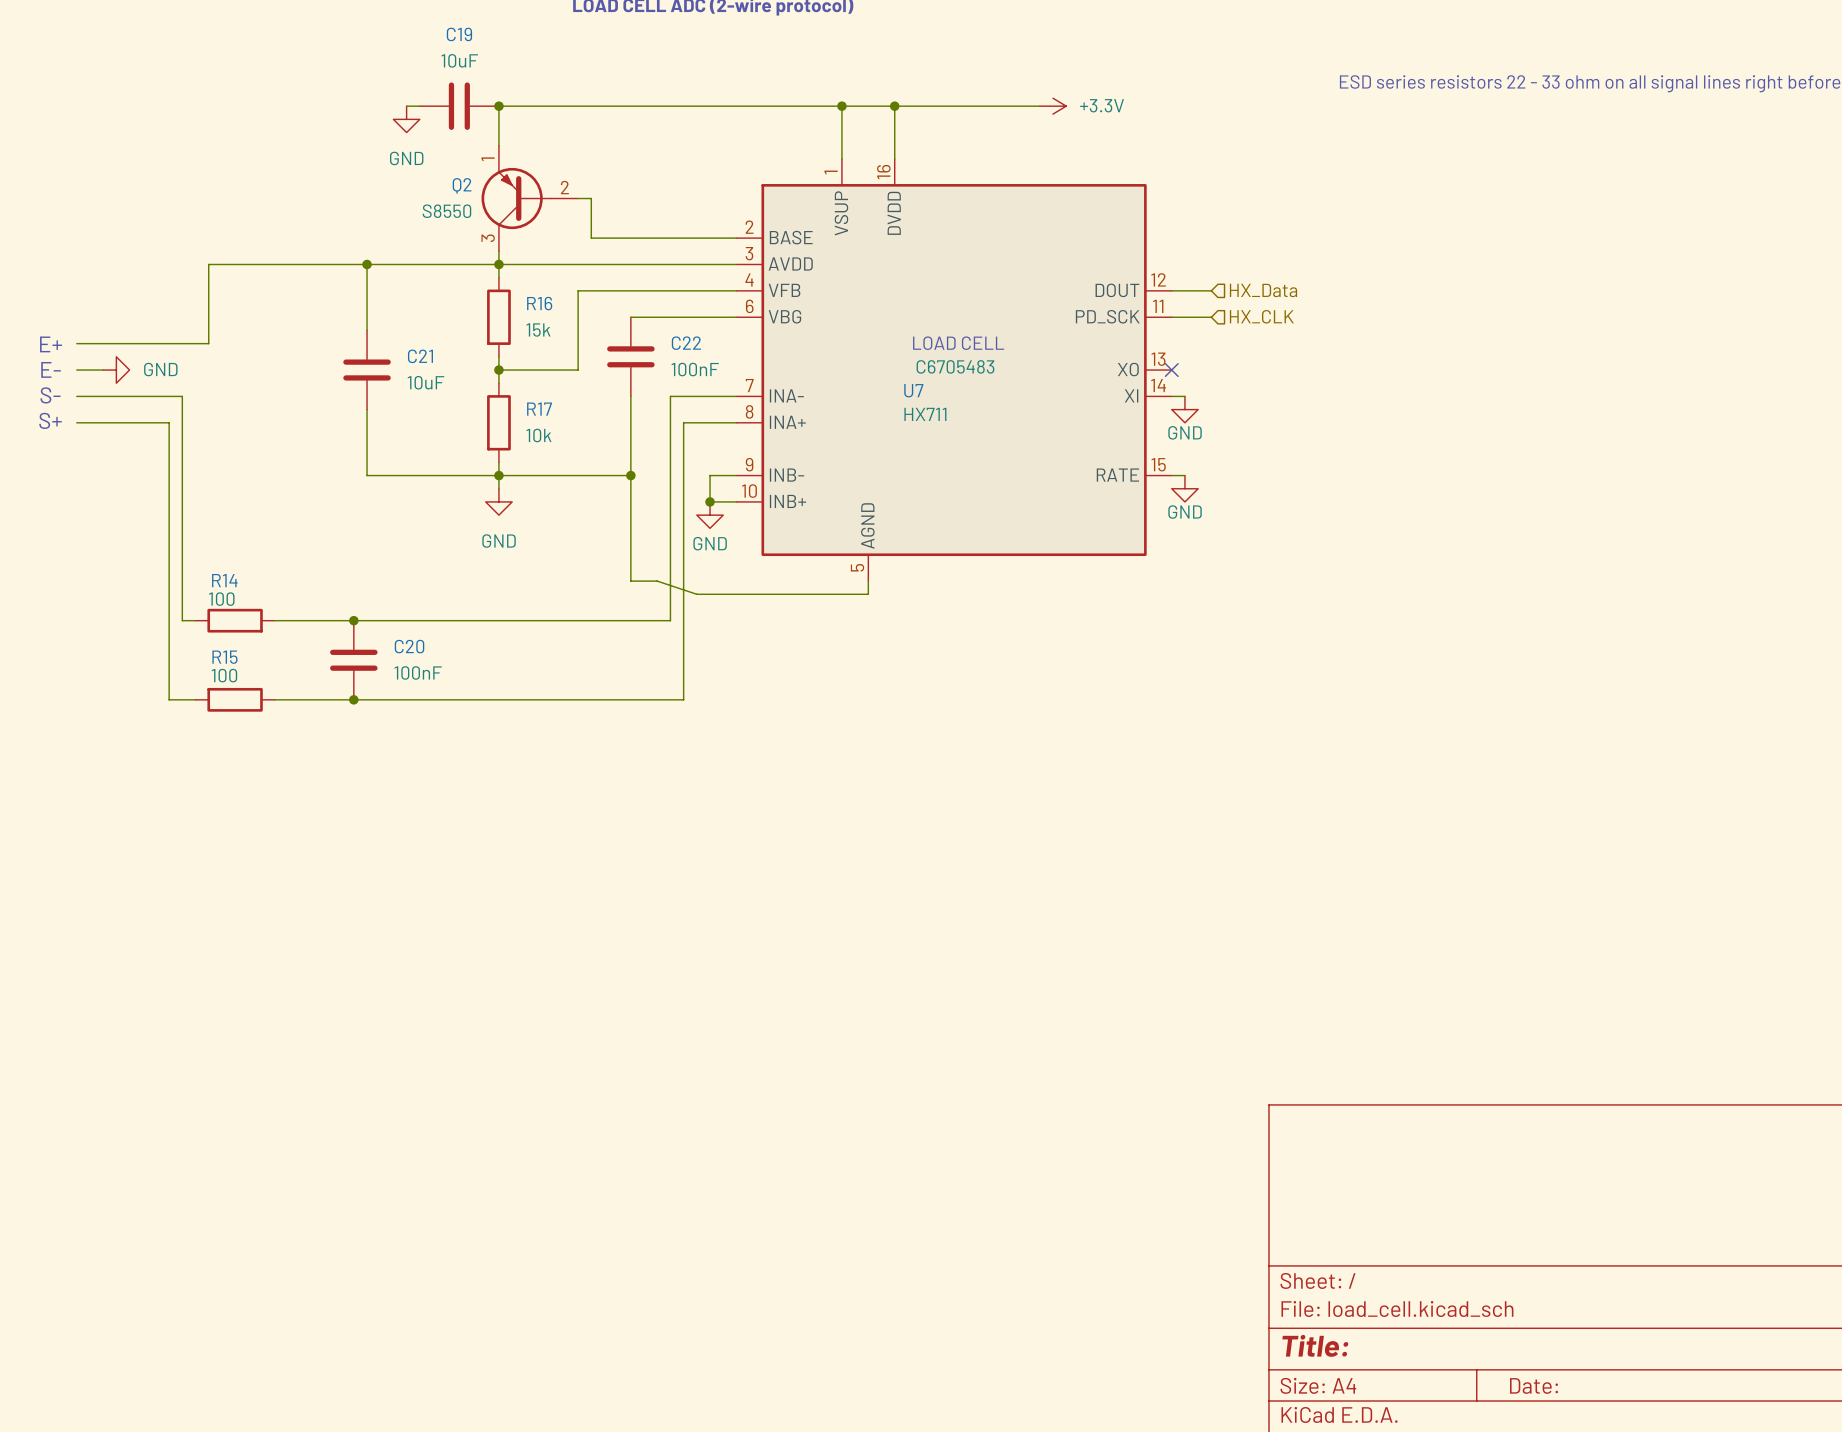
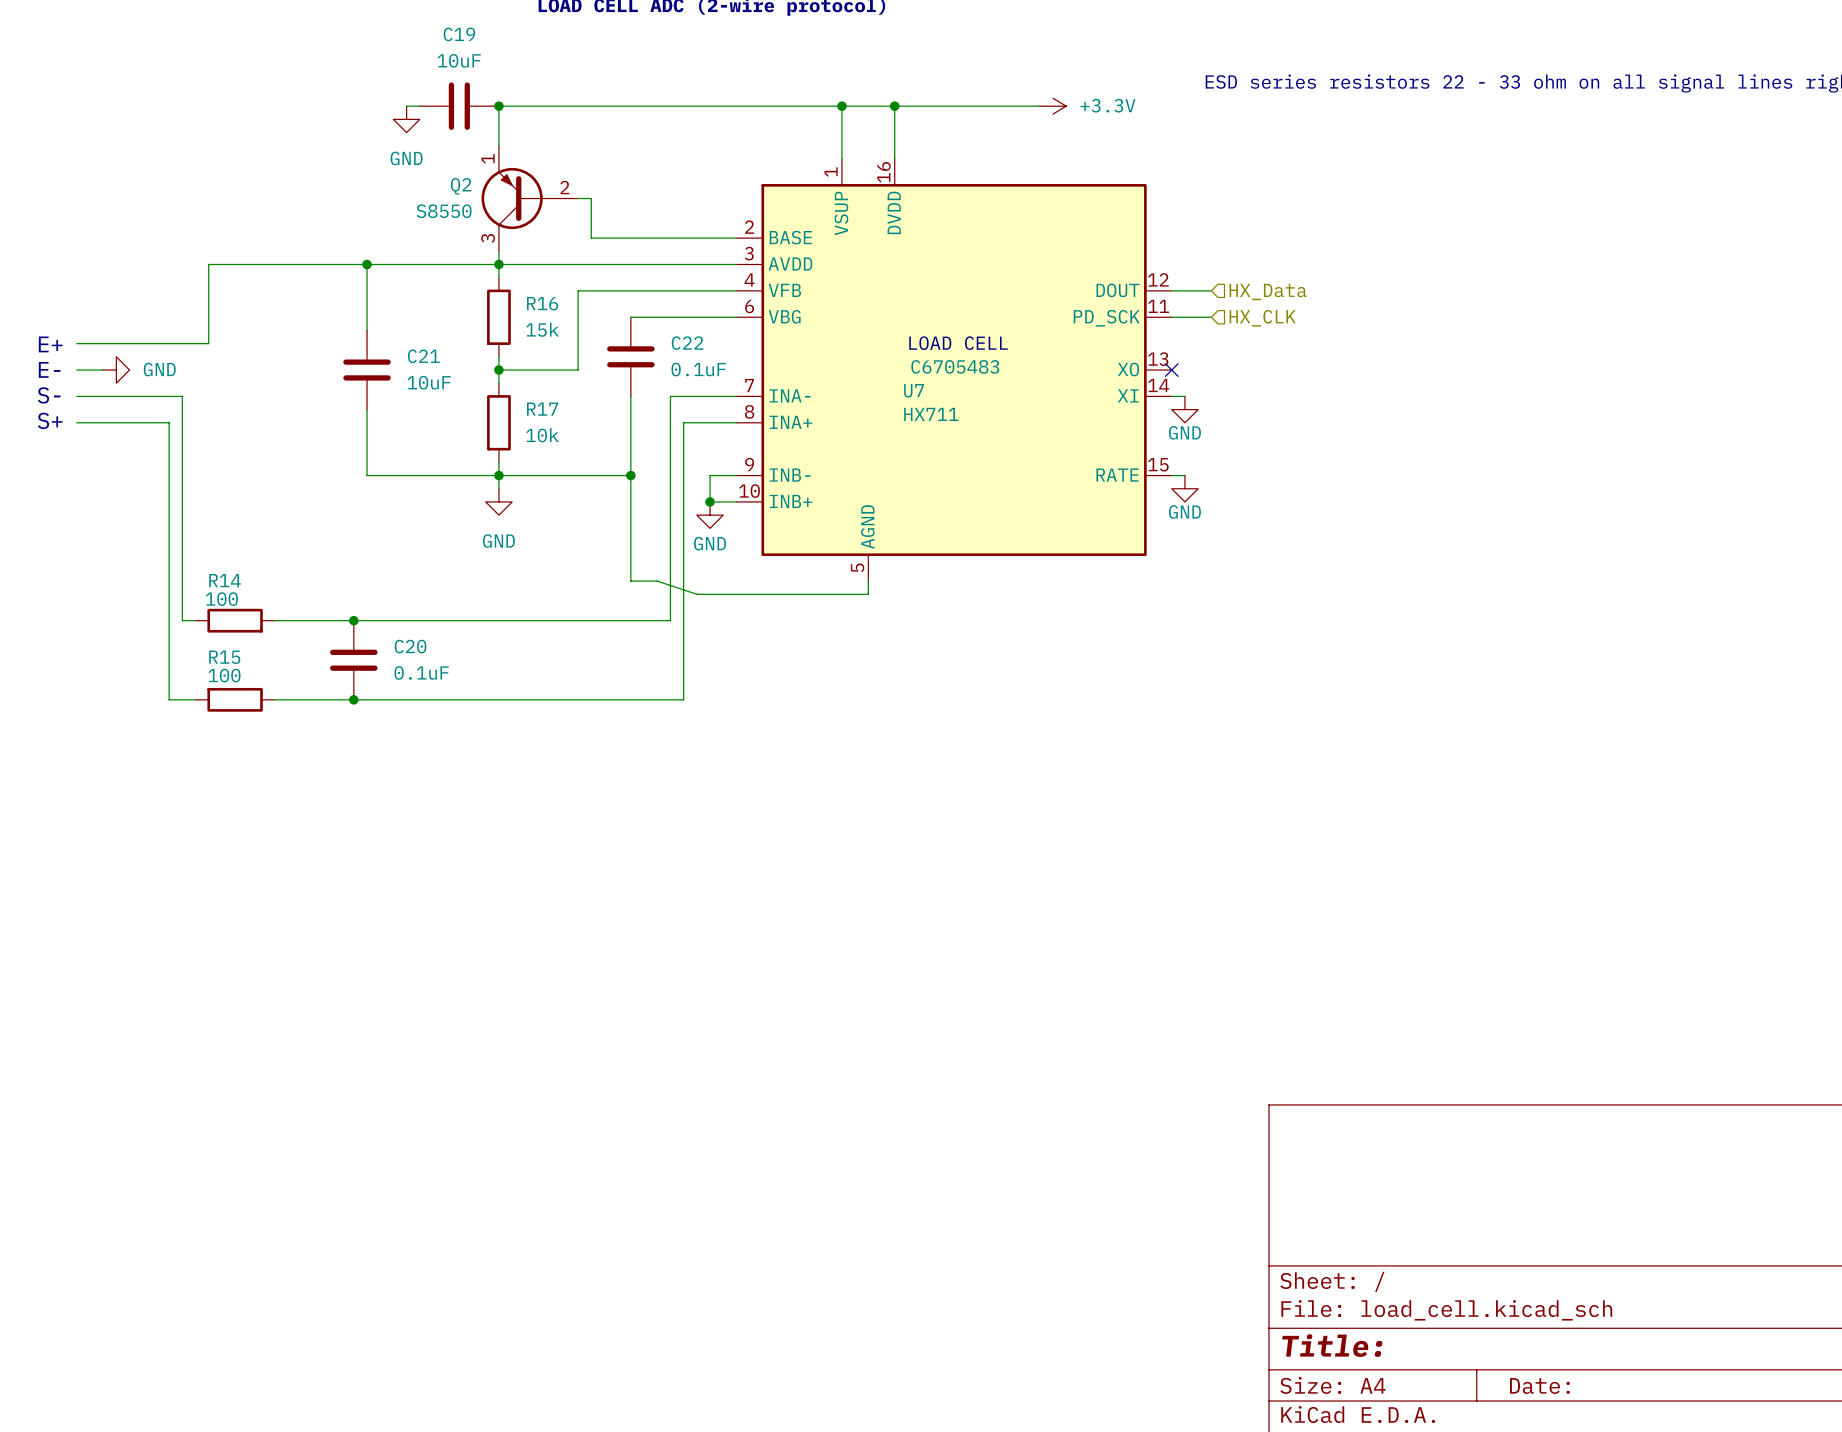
C22 value: 100nF (695, 369) -> 0.1uF (698, 369)
C20 value: 100nF (418, 672) -> 0.1uF (421, 672)

